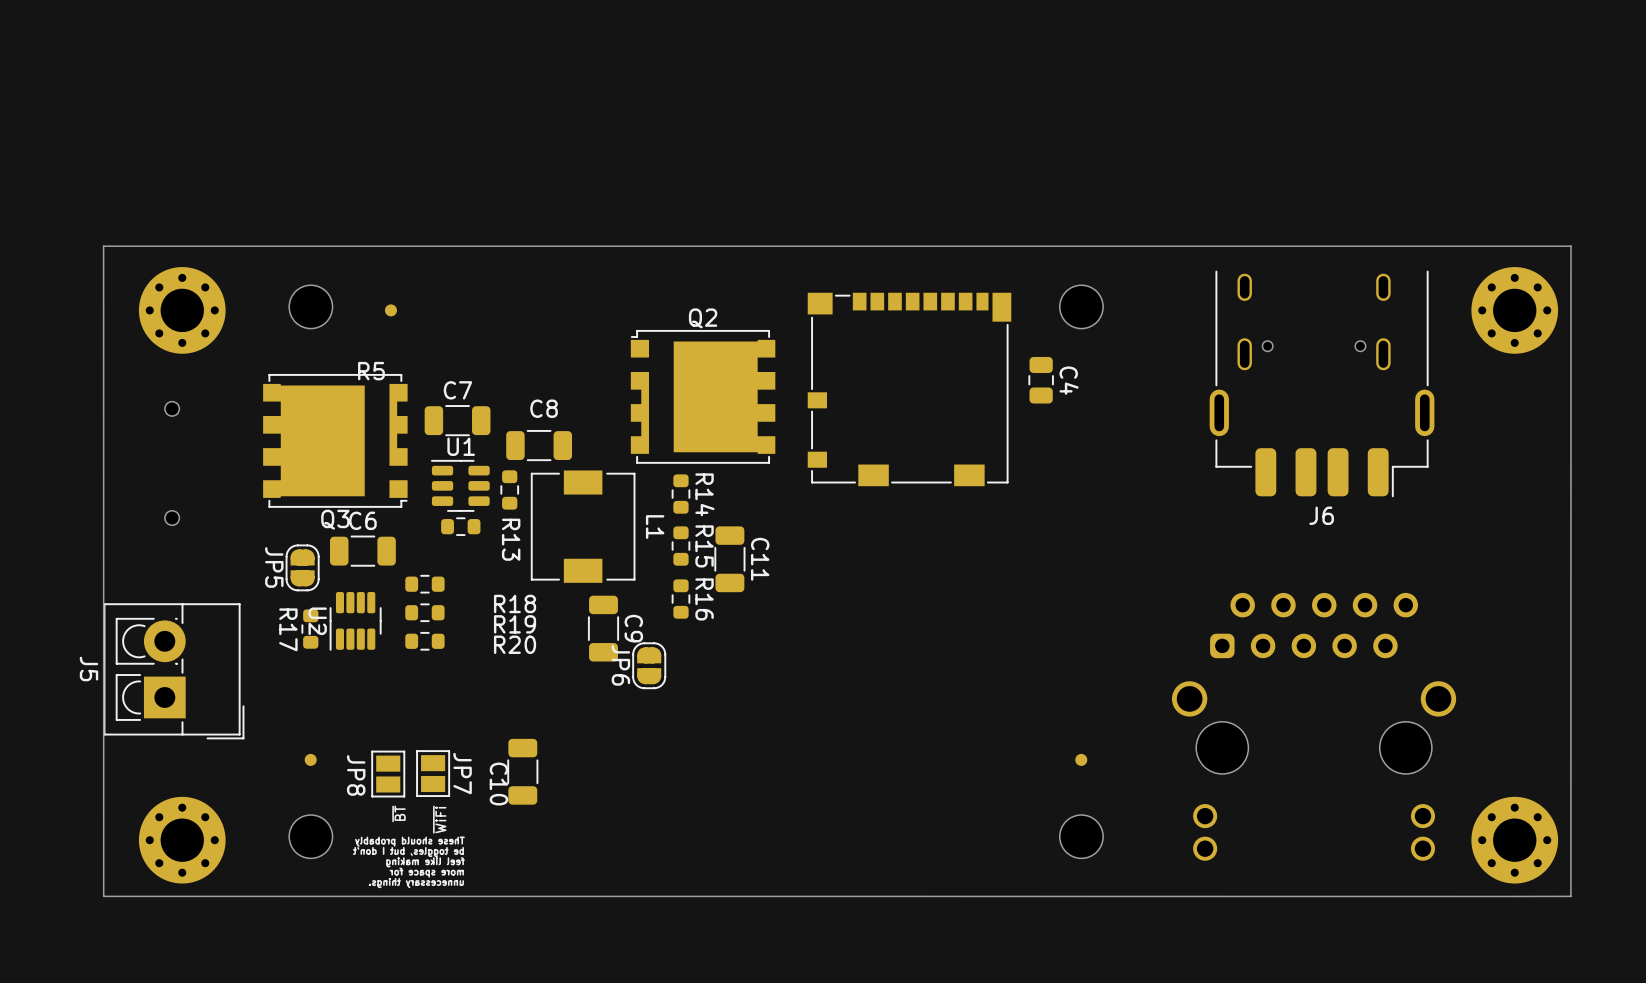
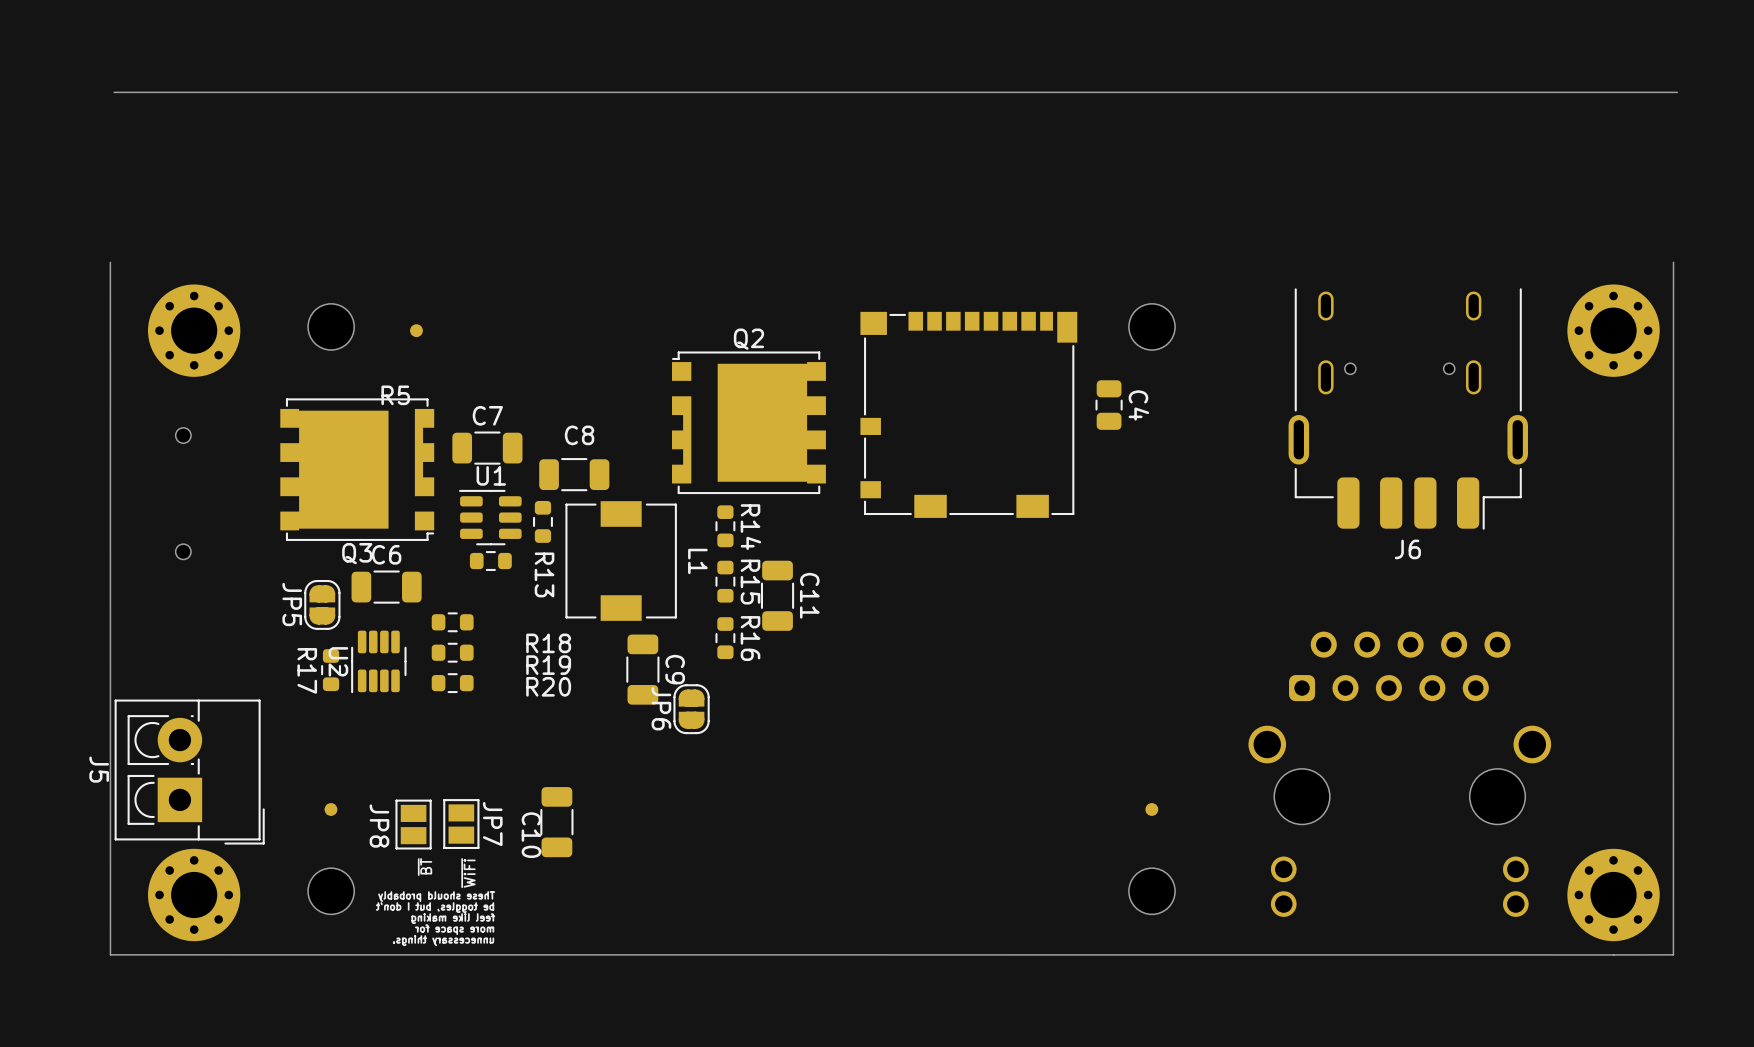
board edge: (1571, 246) (103, 246) -> (1677, 92) (114, 92)
J5 position: (173, 671) -> (189, 772)

